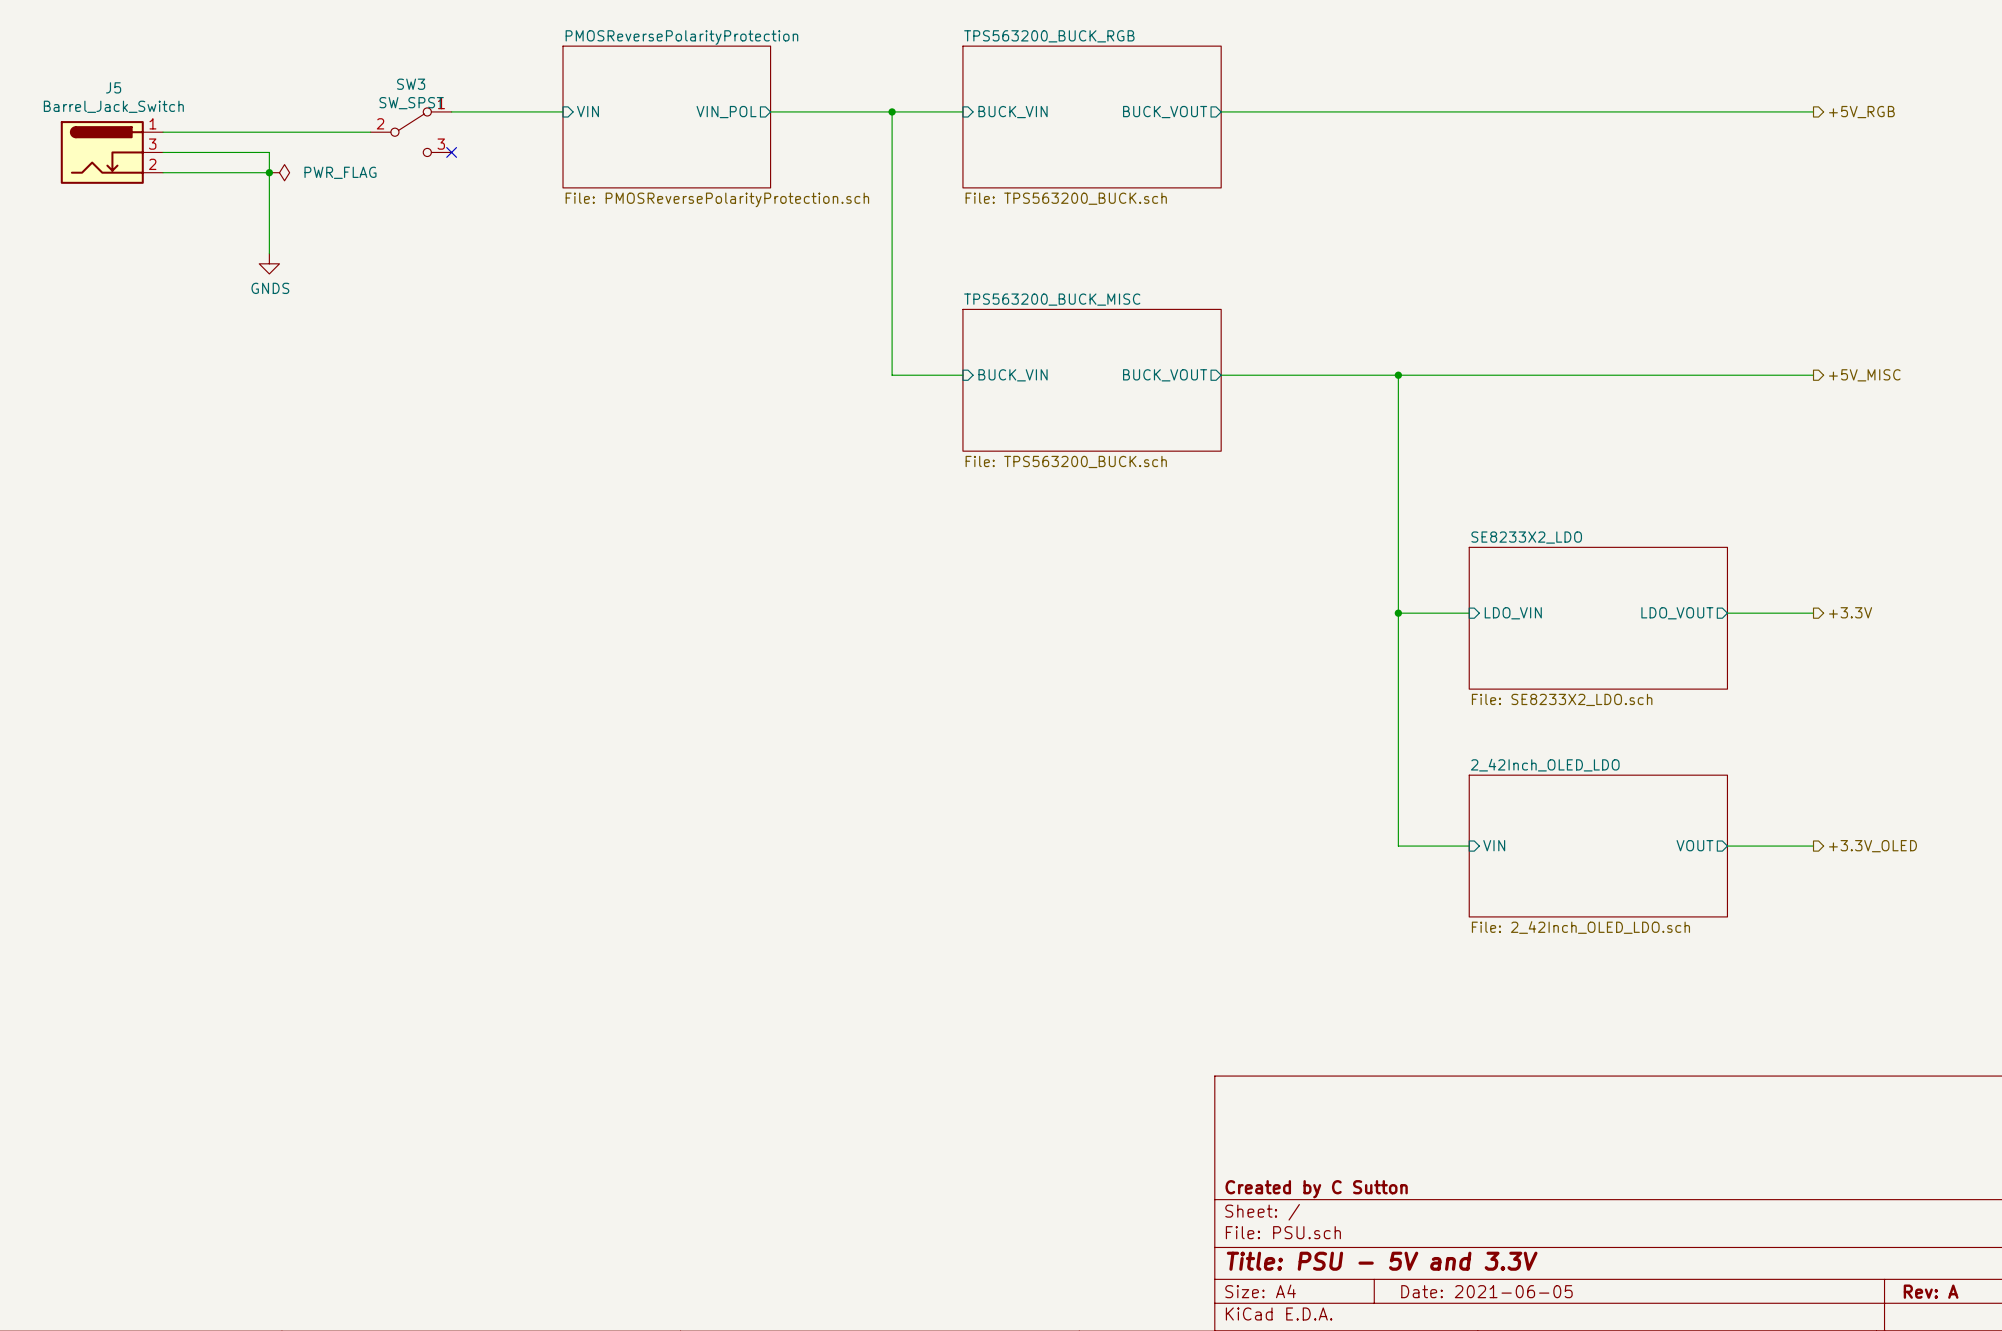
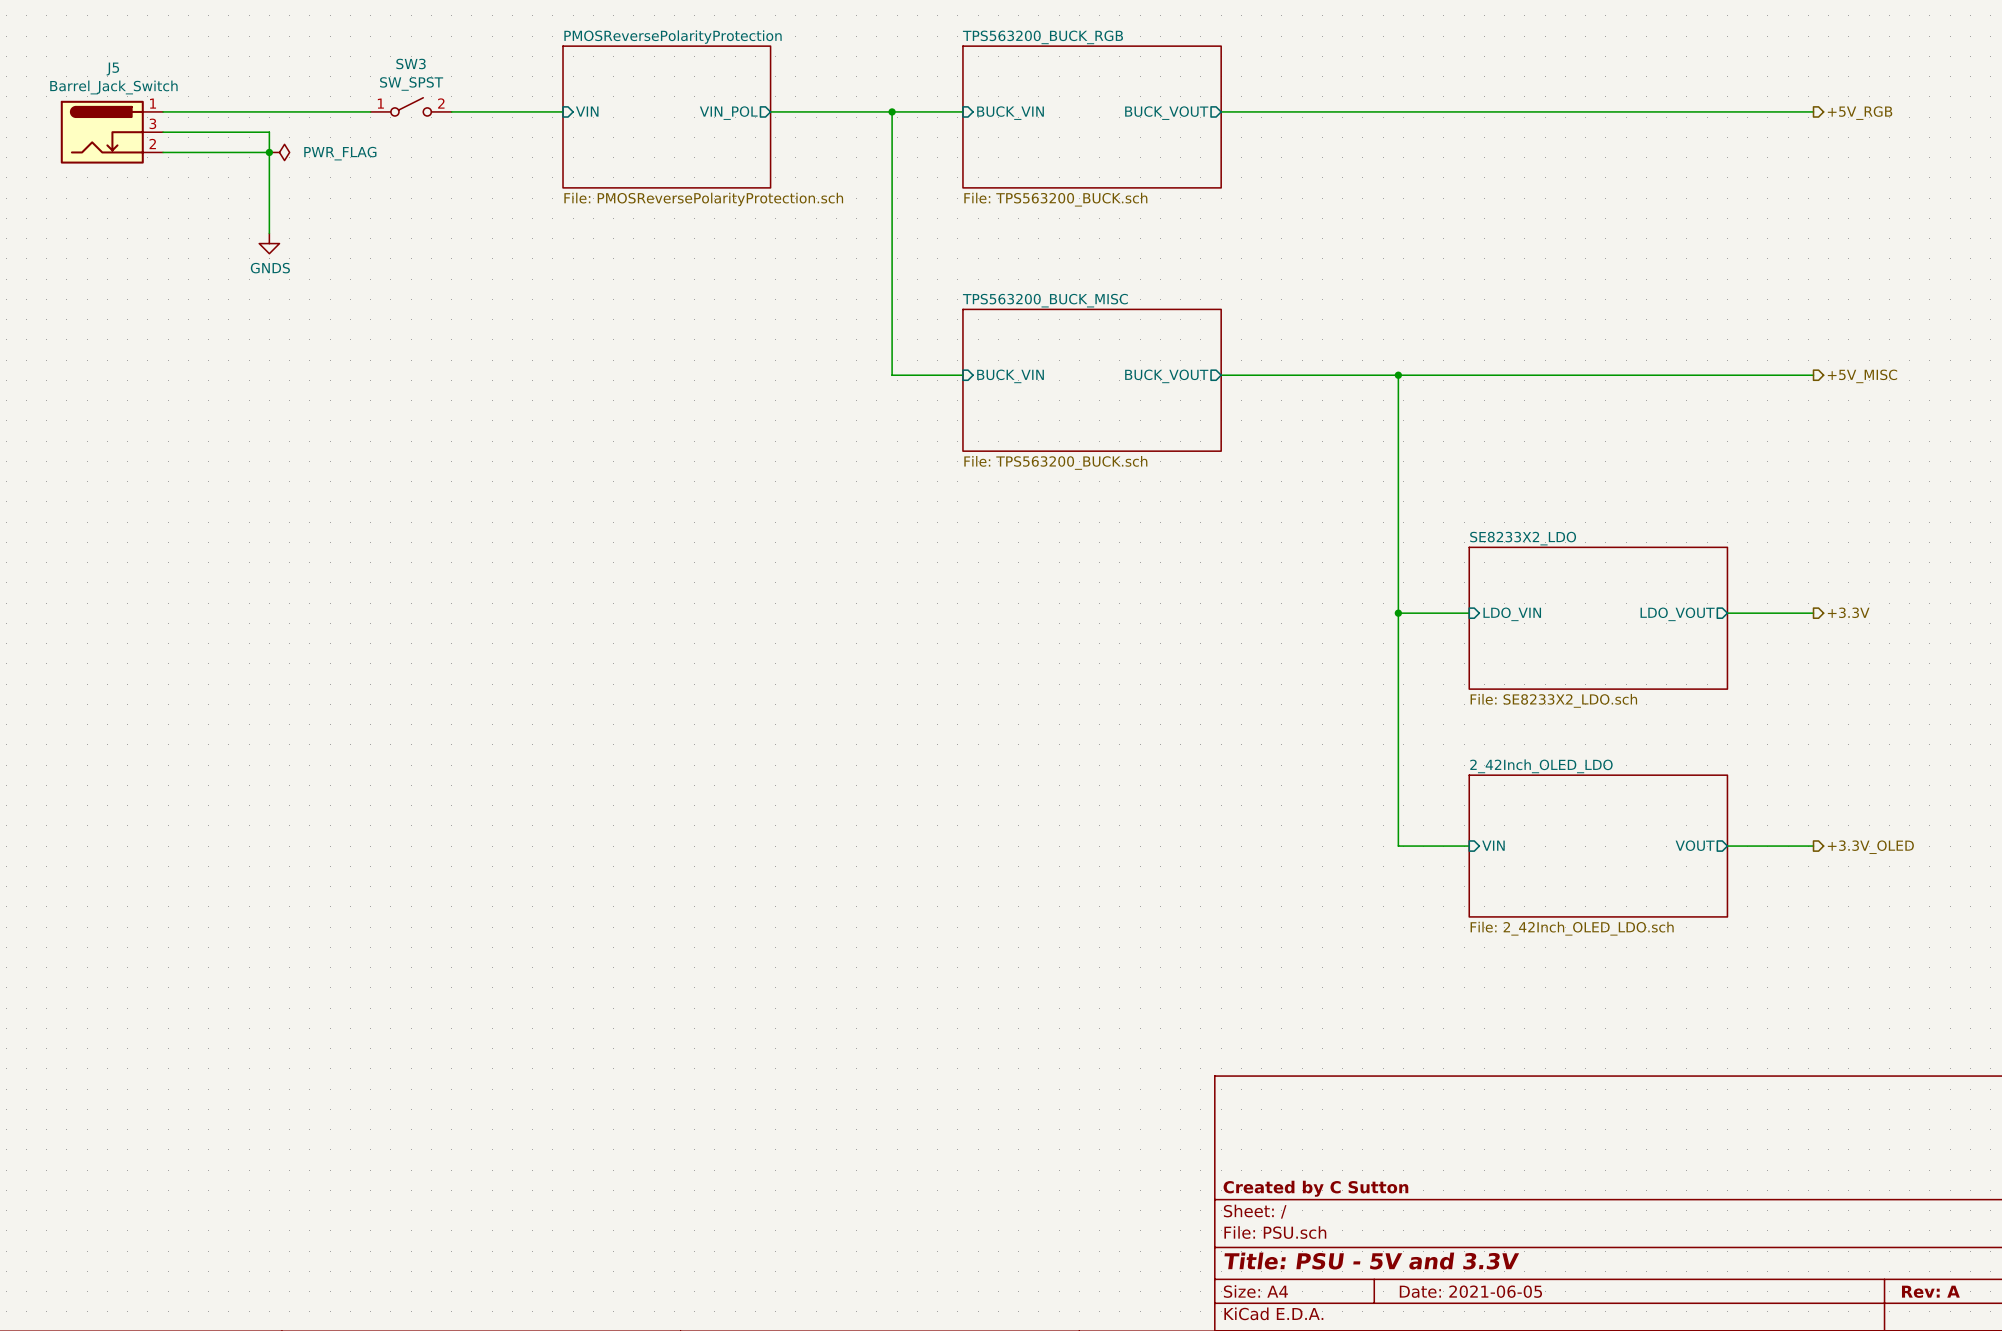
SW3 symbol: [370, 107, 452, 157] -> [370, 97, 452, 117]
wire: none -> (163, 111) (370, 111)
wire: (269, 132) (370, 132) -> (269, 132) (269, 152)
J5 position: (111, 152) -> (111, 132)
no-connect mark: (451, 152) -> none
wire: (163, 172) (269, 172) -> none
junction position: (269, 172) -> (269, 152)
power symbol position: PWR_FLAG (279, 172) -> PWR_FLAG (279, 152)
power symbol position: GNDS (269, 263) -> GNDS (269, 243)

